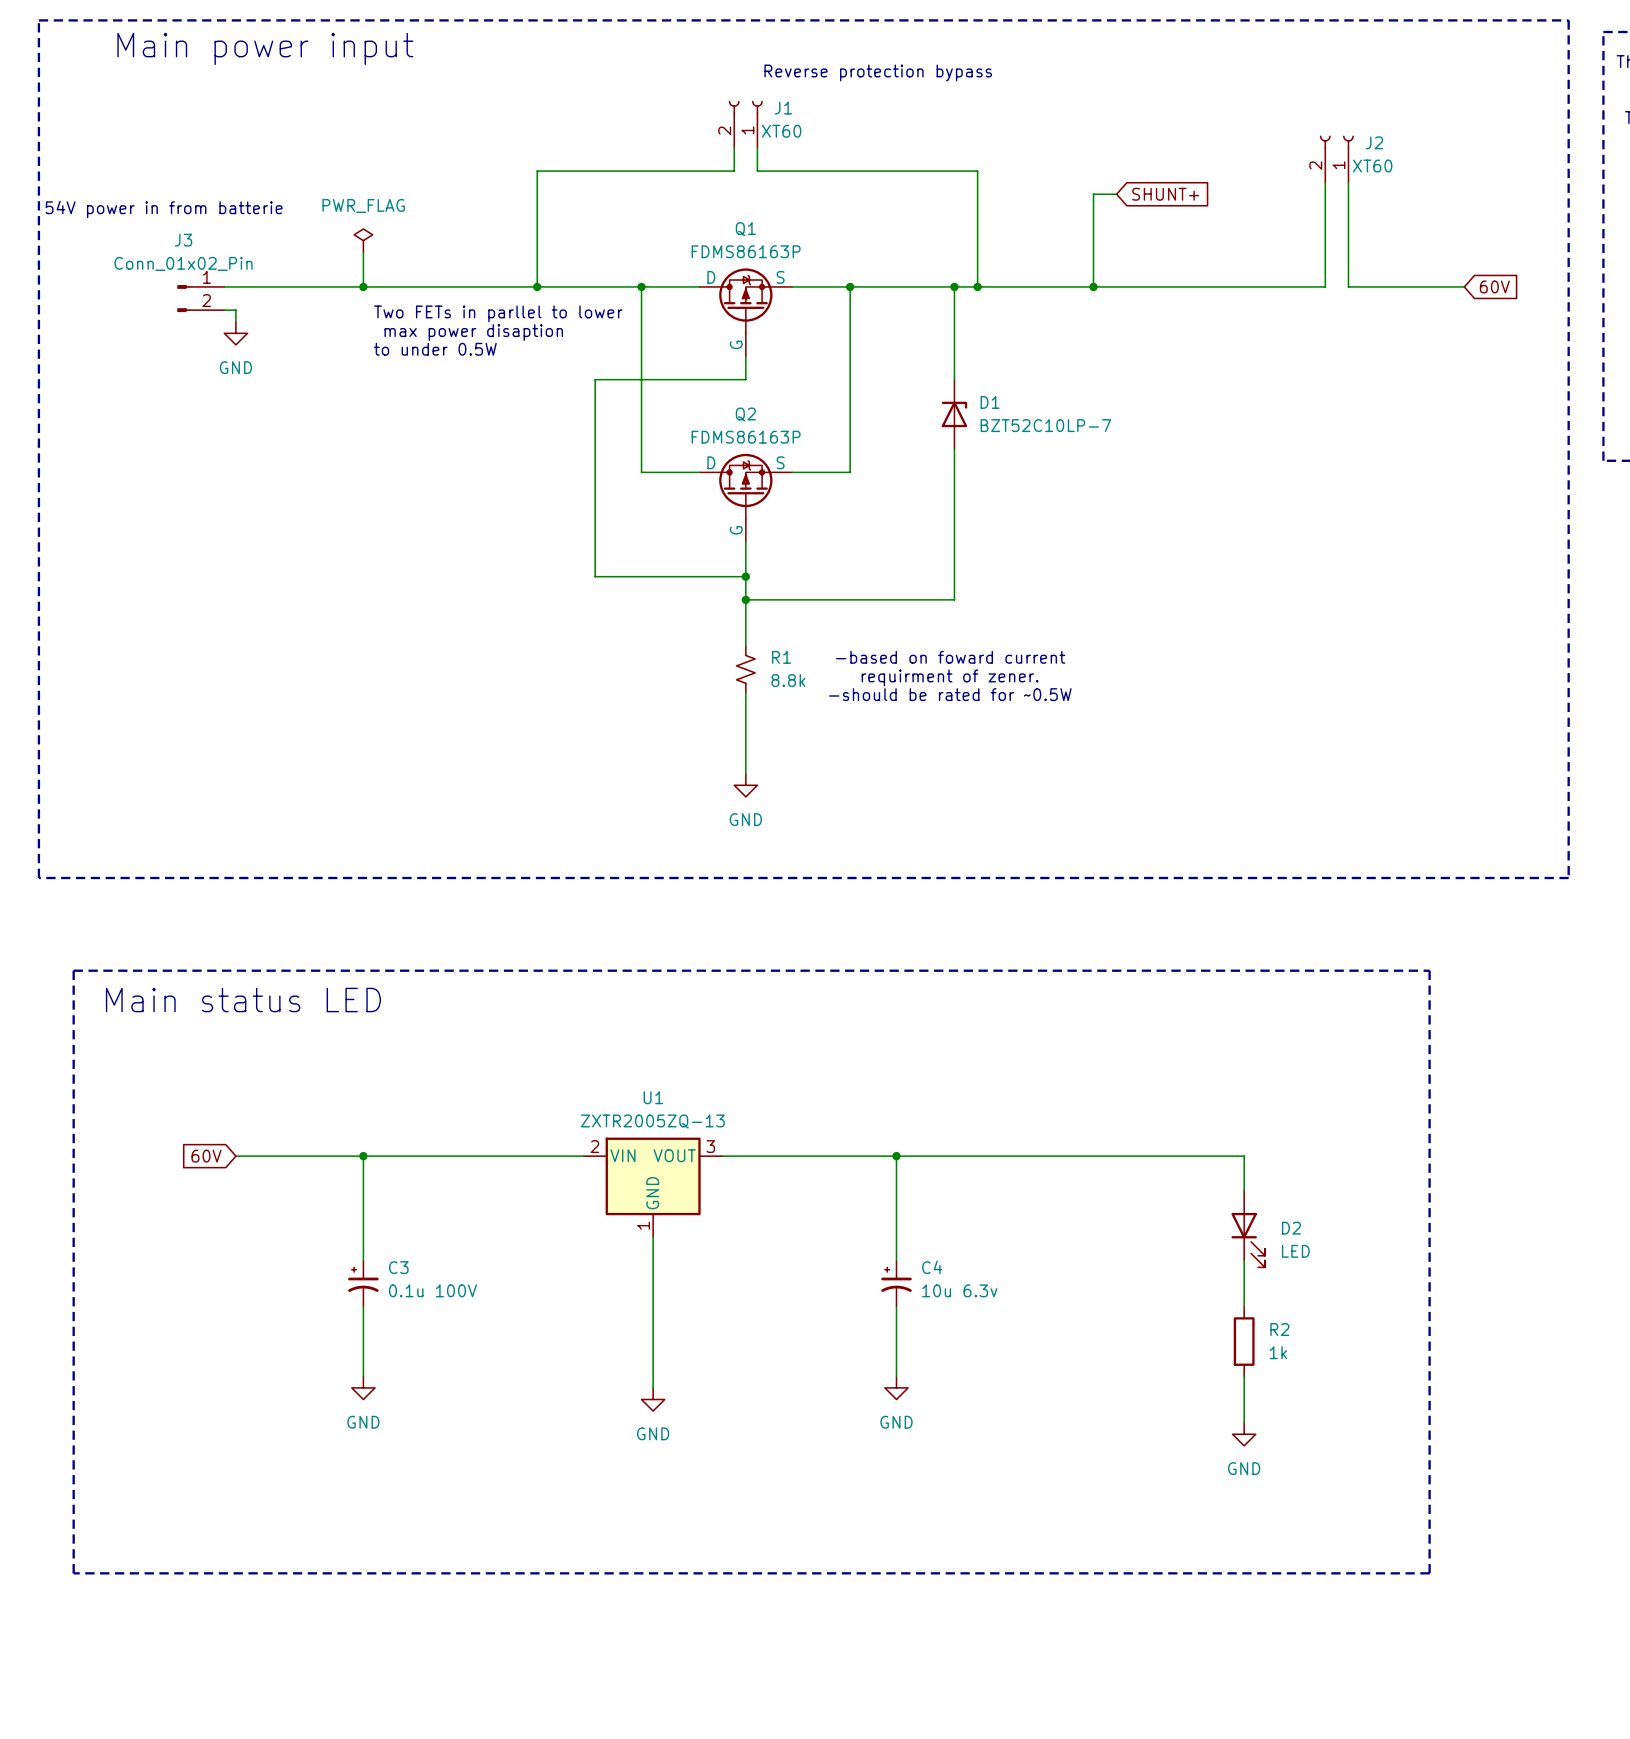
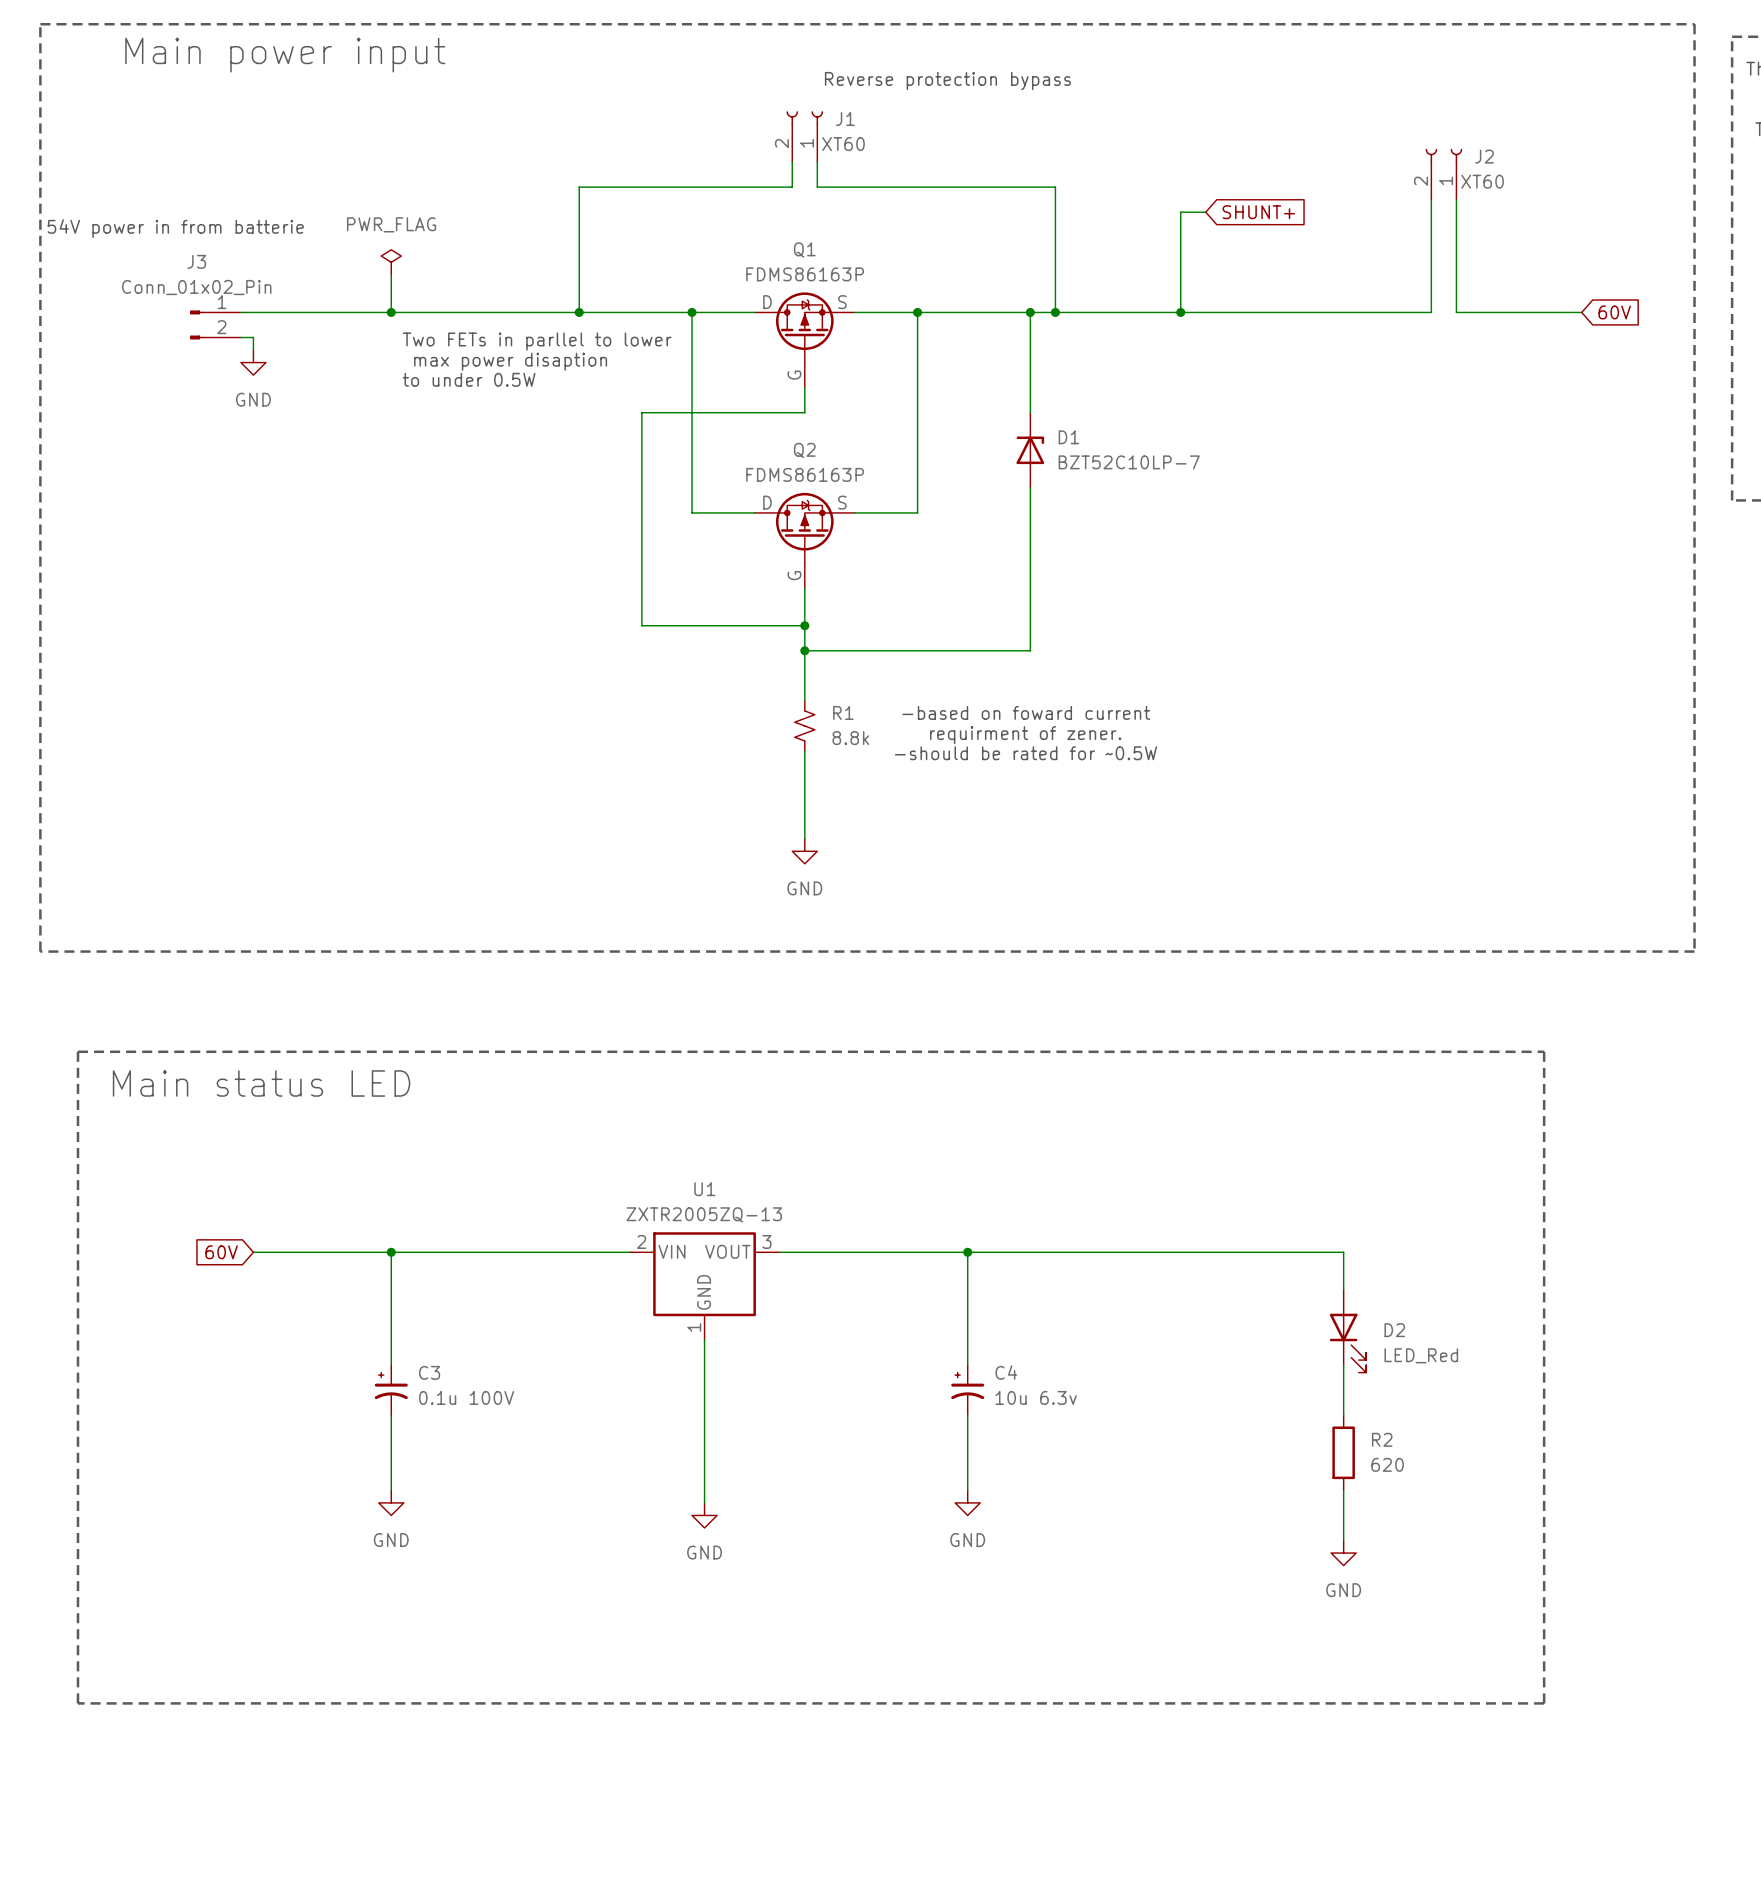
D2 value: LED (1295, 1251) -> LED_Red (1421, 1355)
R2 value: 1k (1278, 1352) -> 620 (1387, 1464)

